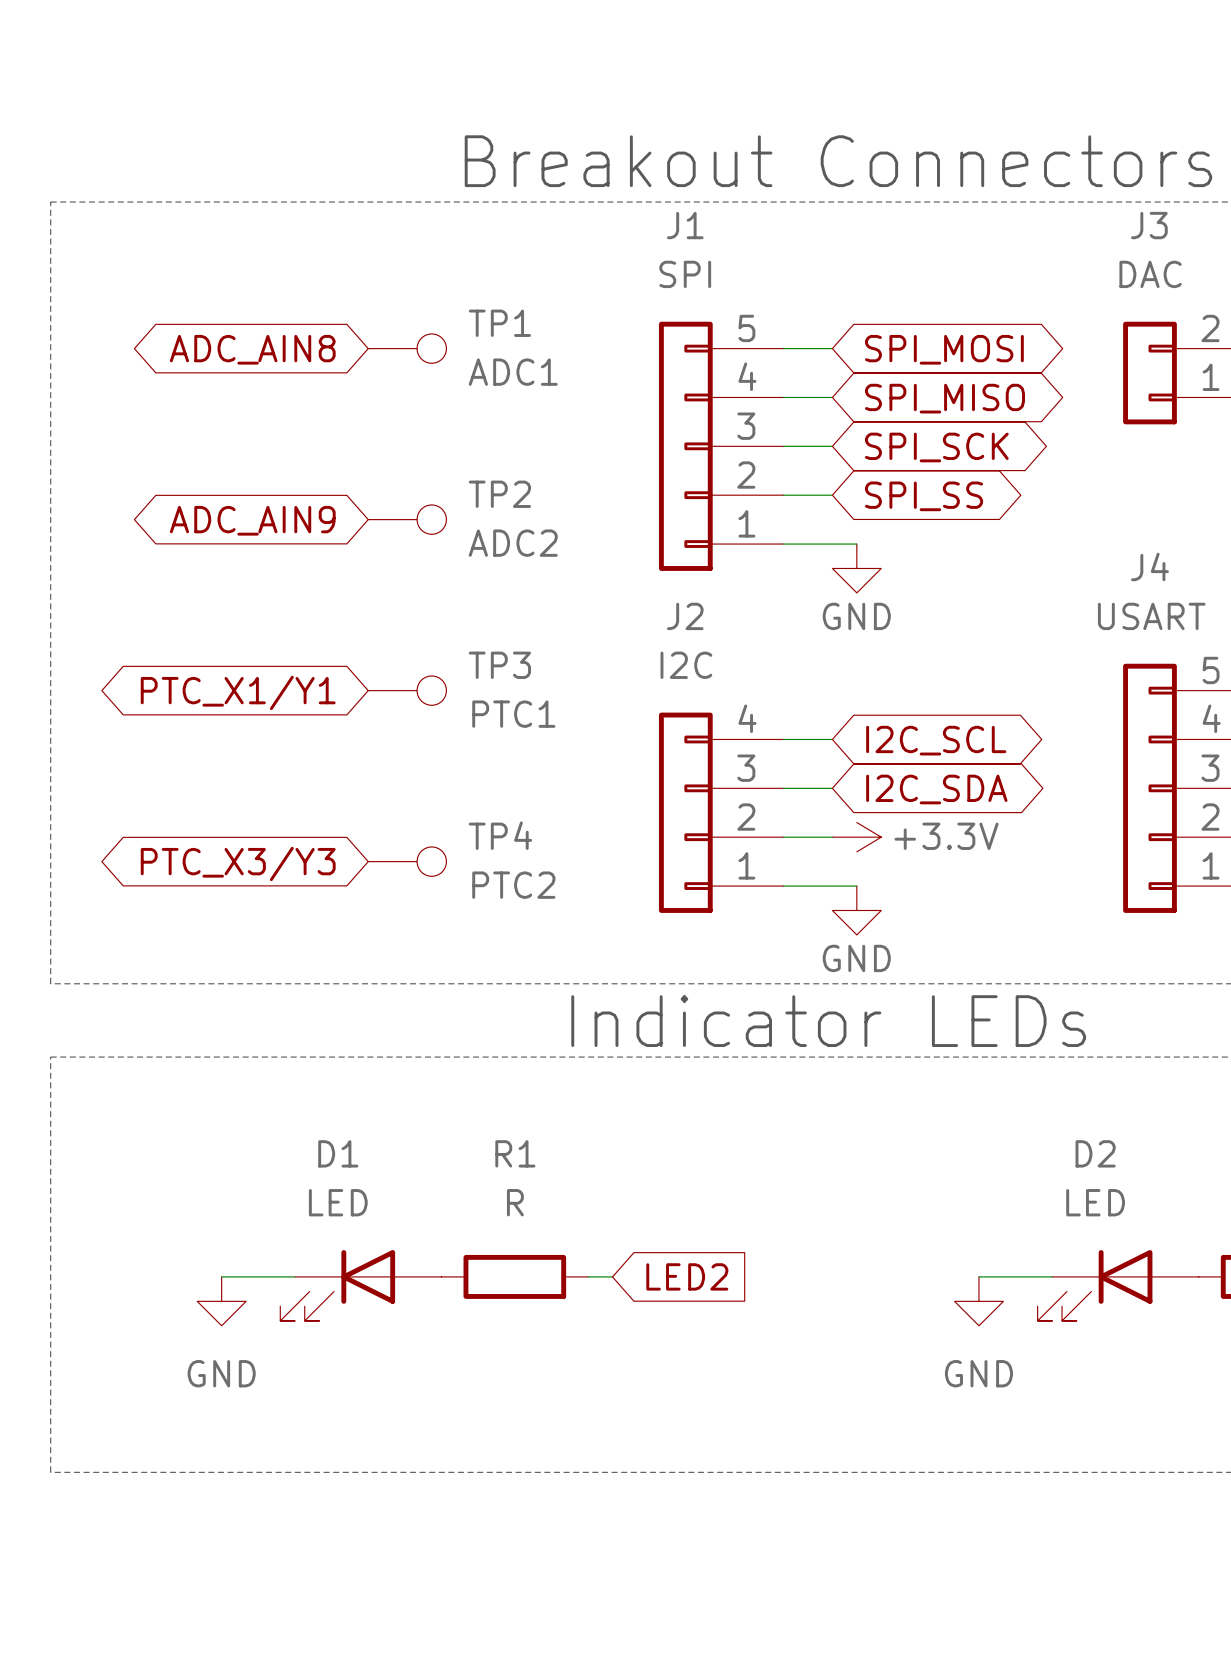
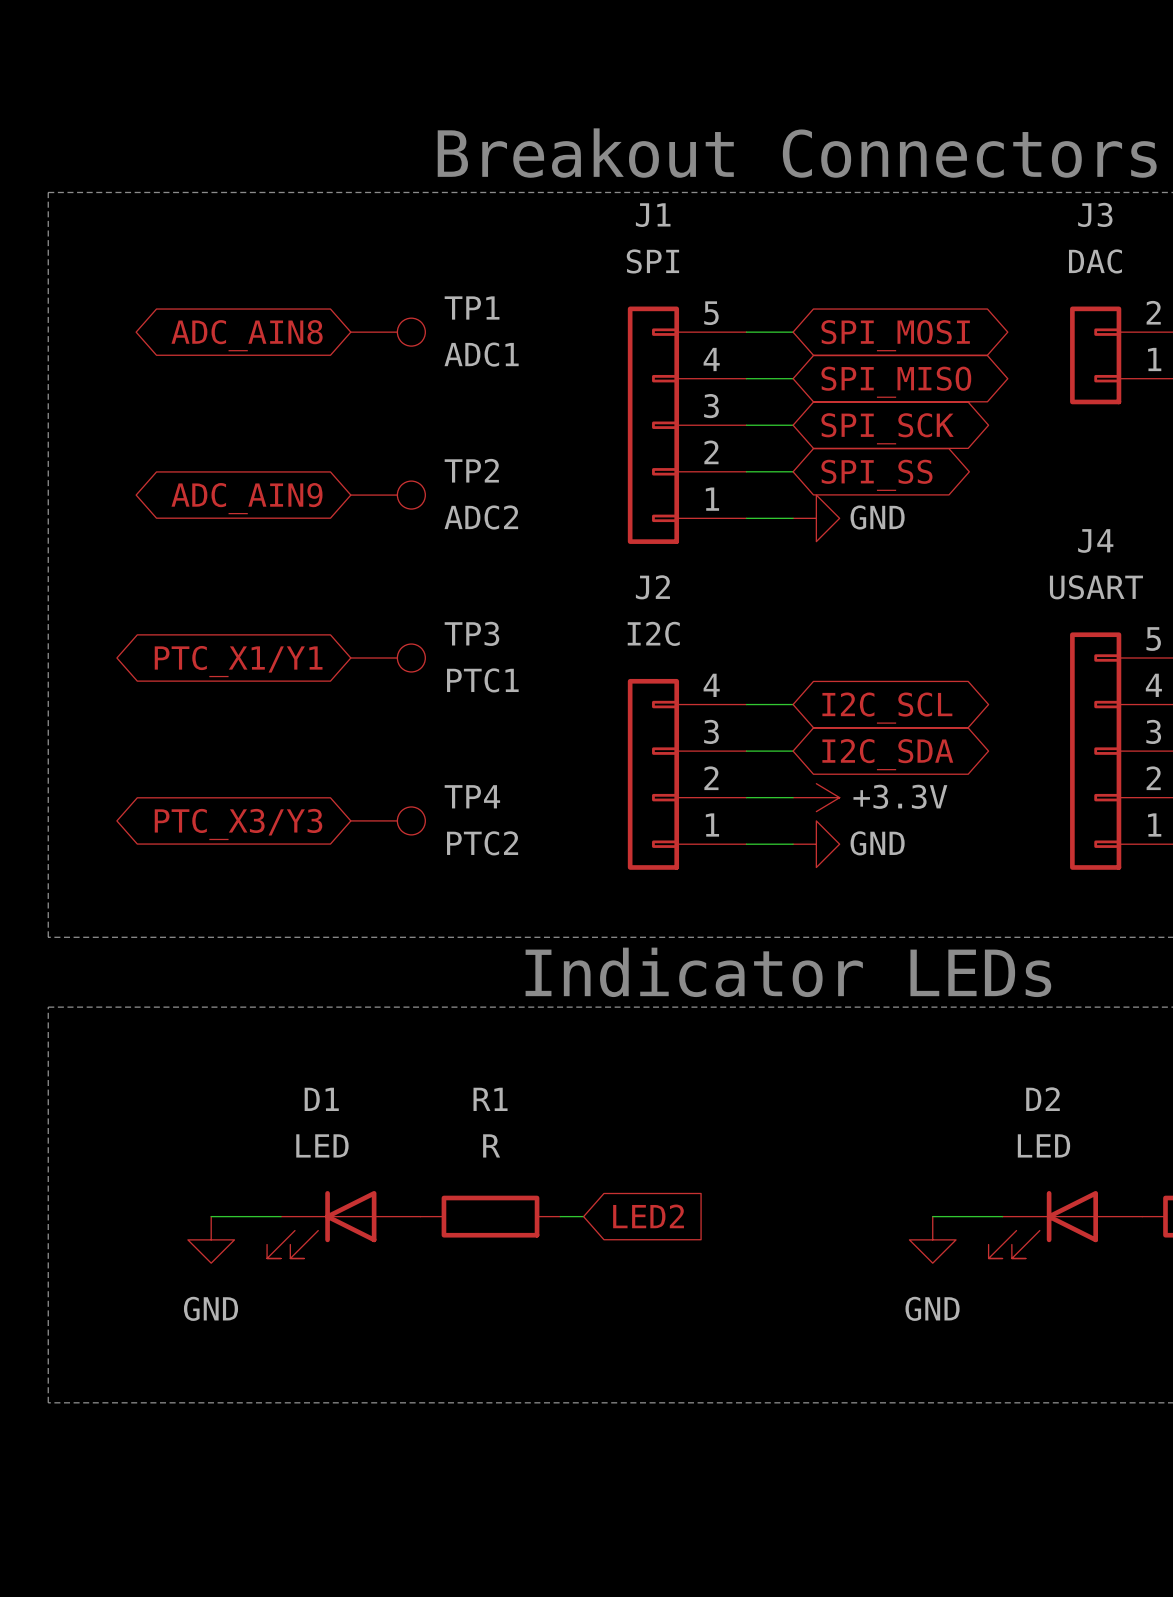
power symbol rotation: 0° (856, 568) -> 90° counterclockwise (816, 518)
power symbol rotation: 0° (856, 910) -> 90° counterclockwise (816, 844)

